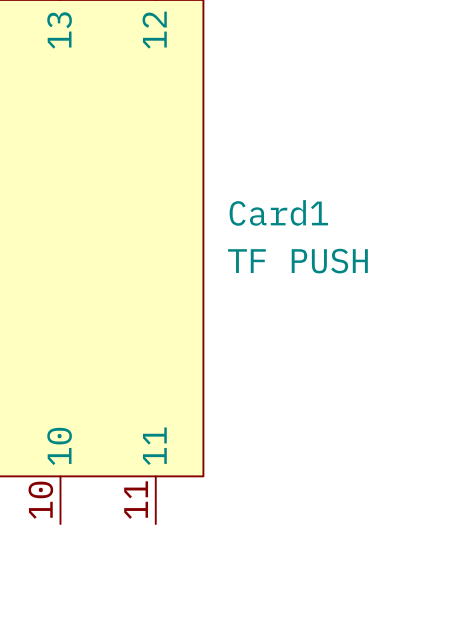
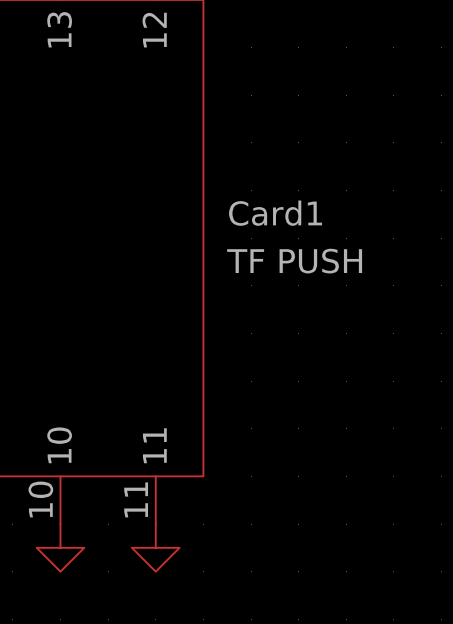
power symbol: none -> (60, 547)
power symbol: none -> (155, 547)

